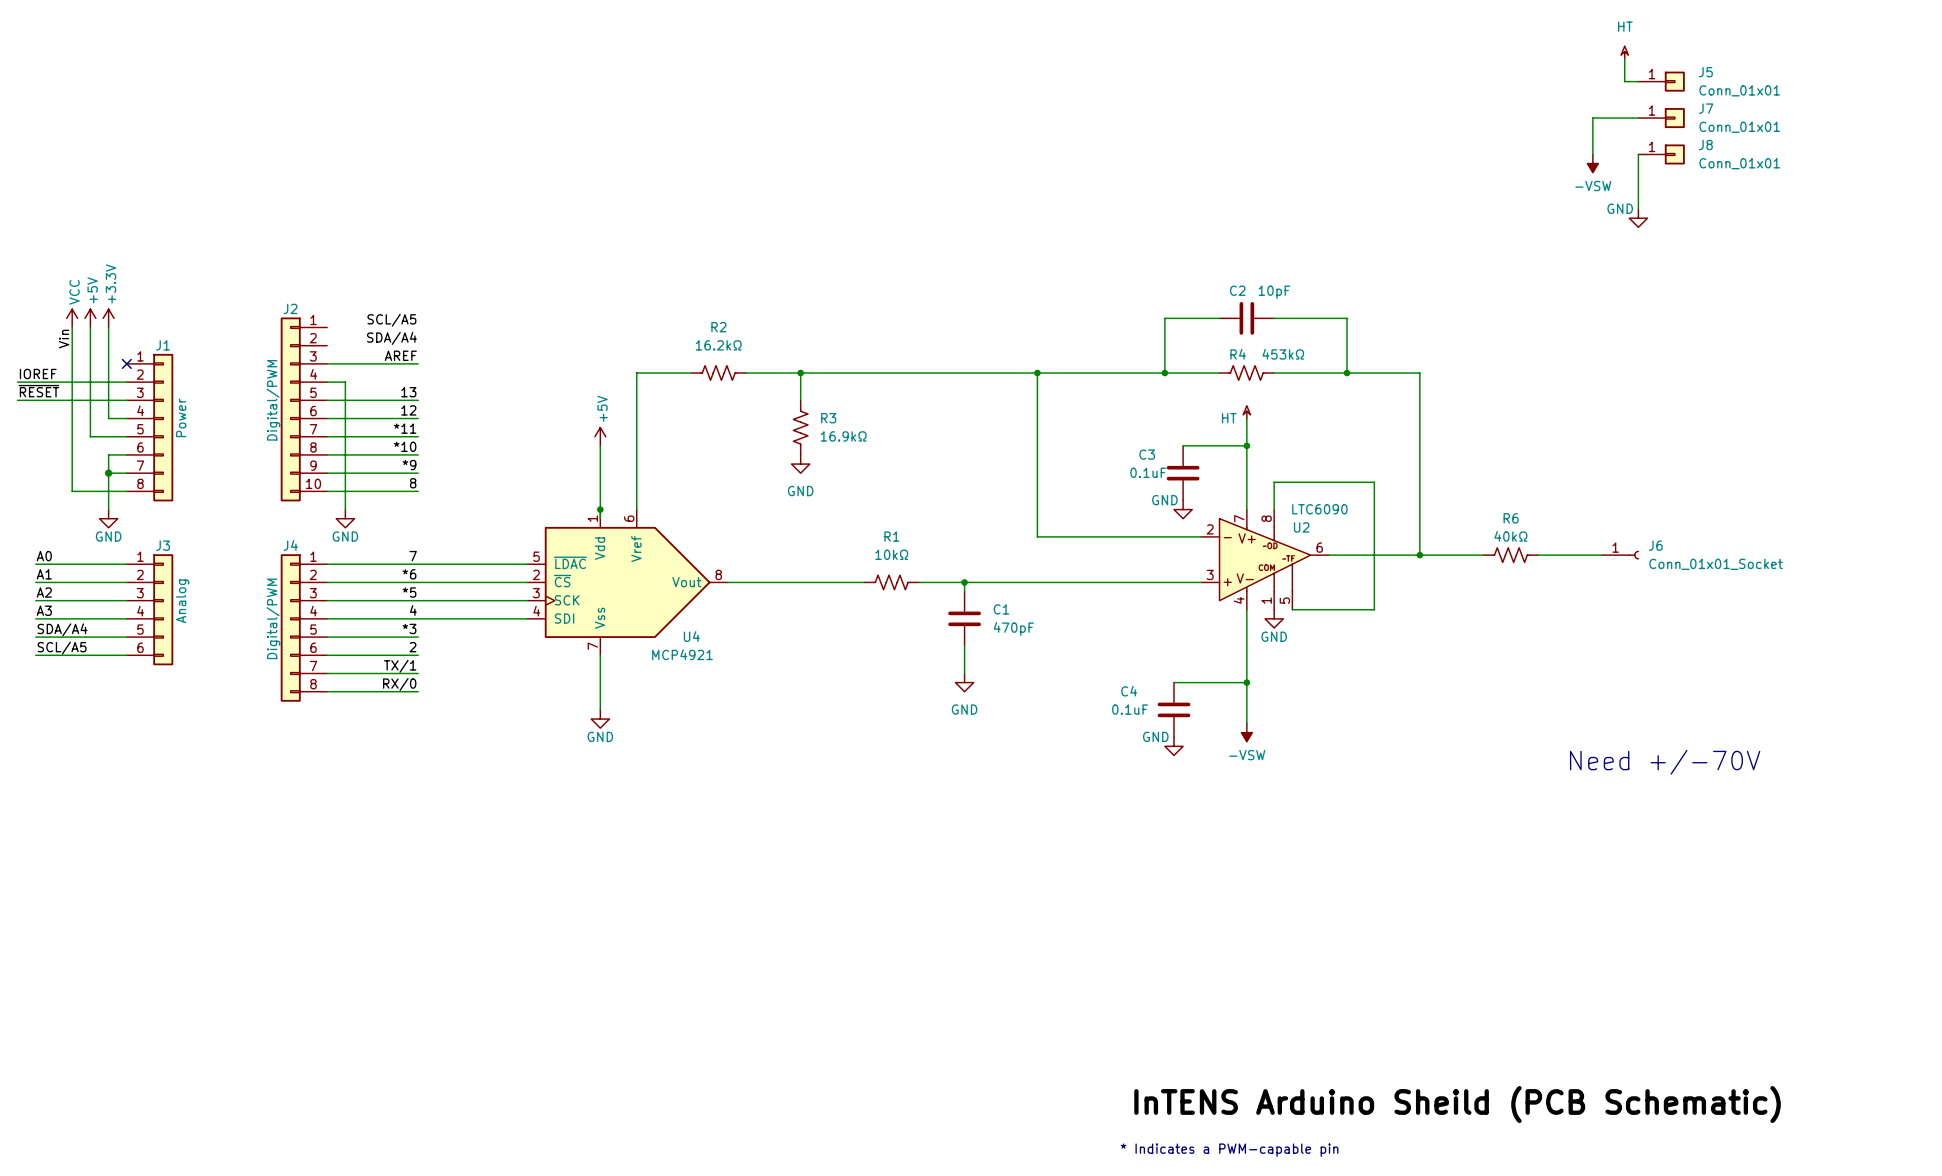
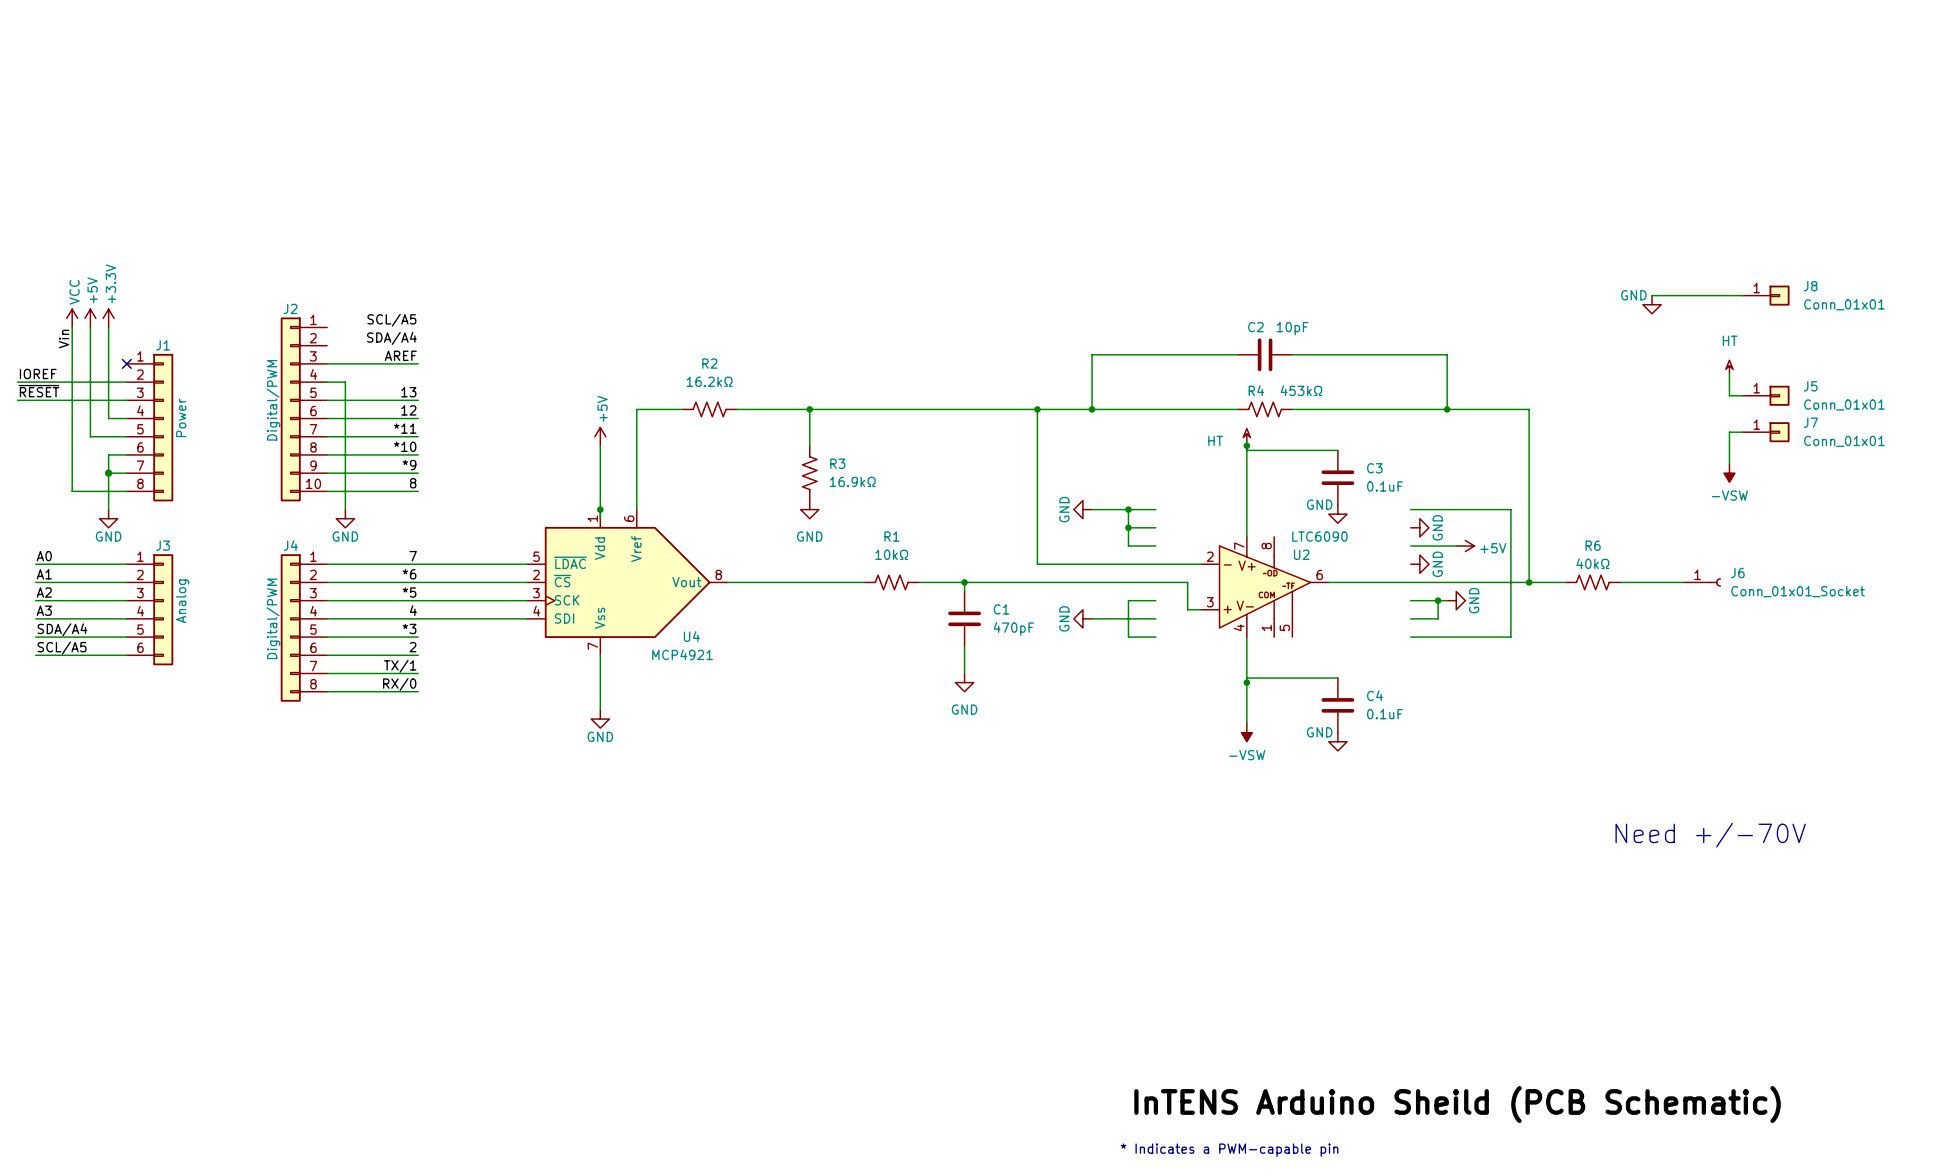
power symbol: HT (1624, 52) -> none
wire: (1624, 58) (1624, 81) (1638, 81) -> none
J5 position: (1661, 81) -> (1766, 395)
wire: (1638, 118) (1592, 118) (1592, 154) -> none
J7 position: (1661, 118) -> (1766, 432)
wire: (1638, 154) (1638, 209) -> none
J8 position: (1661, 154) -> (1766, 295)
power symbol: -VSW (1592, 163) -> none
power symbol position: GND (1638, 218) -> GND (1652, 304)
wire: none -> (1652, 295) (1743, 295)
wire: (1219, 318) (1164, 318) (1164, 373) -> none
C2 position: (1246, 318) -> (1265, 354)
wire: (1274, 318) (1347, 318) (1347, 373) -> none
wire: none -> (1237, 354) (1092, 354) (1092, 409)
wire: none -> (1292, 354) (1447, 354) (1447, 409)
power symbol: none -> HT (1729, 366)
wire: (691, 373) (636, 373) (636, 409) -> (682, 409) (636, 409)
R2 position: (718, 373) -> (709, 409)
wire: (746, 373) (1219, 373) -> none
wire: (800, 373) (800, 400) -> none
junction position: (800, 373) -> (809, 409)
wire: (1037, 373) (1037, 409) -> none
junction: (1037, 373) -> none
junction: (1164, 373) -> none
R4 position: (1246, 373) -> (1265, 409)
wire: (1274, 373) (1419, 373) (1419, 555) -> none
junction: (1347, 373) -> none
wire: none -> (1729, 373) (1729, 395) (1743, 395)
wire: none -> (736, 409) (1237, 409)
wire: none -> (809, 409) (809, 445)
junction: none -> (1037, 409)
junction: none -> (1092, 409)
wire: none -> (1292, 409) (1529, 409) (1529, 582)
junction: none -> (1447, 409)
power symbol position: HT (1246, 412) -> HT (1246, 434)
power symbol text position: HT (1229, 418) -> HT (1215, 440)
wire: (1246, 418) (1246, 441) -> none
R3 position: (800, 427) -> (809, 473)
wire: none -> (1743, 432) (1729, 432) (1729, 464)
wire: (1183, 445) (1246, 445) -> (1092, 509) (1155, 509)
wire: none -> (1246, 450) (1337, 450)
C3 name position: C3 (1147, 454) -> C3 (1374, 468)
power symbol position: GND (800, 464) -> GND (809, 509)
C3 value position: 0.1uF (1148, 472) -> 0.1uF (1385, 486)
C3 position: (1183, 473) -> (1337, 477)
power symbol: none -> -VSW (1729, 473)
power symbol: none -> GND (1082, 509)
wire: none -> (1128, 509) (1128, 546) (1155, 546)
junction: none -> (1128, 509)
power symbol: GND (1183, 509) -> none
wire: (1274, 509) (1274, 482) (1374, 482) (1374, 609) (1292, 609) -> none
wire: none -> (1410, 509) (1510, 509) (1510, 637) (1410, 637)
power symbol: none -> GND (1337, 514)
wire: none -> (1128, 527) (1155, 527)
junction: none -> (1128, 527)
power symbol: none -> GND (1419, 527)
wire: (1037, 536) (1201, 536) -> (1037, 536) (1037, 564) (1201, 564)
wire: none -> (1410, 546) (1456, 546)
power symbol: none -> +5V (1465, 546)
wire: (1328, 555) (1483, 555) -> none
junction: (1419, 555) -> none
R6 position: (1510, 555) -> (1592, 582)
wire: (1538, 555) (1601, 555) -> (1620, 582) (1683, 582)
J6 position: (1620, 555) -> (1702, 582)
U2 position: (1265, 559) -> (1265, 586)
power symbol: none -> GND (1419, 564)
wire: (1187, 582) (1201, 582) -> (1187, 582) (1187, 609) (1201, 609)
wire: none -> (1328, 582) (1565, 582)
junction: none -> (1529, 582)
wire: none -> (1155, 600) (1128, 600) (1128, 637) (1155, 637)
wire: none -> (1410, 600) (1447, 600)
wire: none -> (1438, 600) (1438, 618) (1410, 618)
junction: none -> (1438, 600)
power symbol: none -> GND (1456, 600)
power symbol: none -> GND (1082, 618)
wire: none -> (1092, 618) (1155, 618)
power symbol: GND (1274, 618) -> none
wire: none -> (1246, 678) (1337, 678)
wire: (1174, 682) (1246, 682) -> none
C4 name position: C4 (1129, 691) -> C4 (1375, 695)
C4 value position: 0.1uF (1130, 709) -> 0.1uF (1385, 714)
C4 position: (1174, 709) -> (1337, 705)
power symbol: none -> GND (1337, 741)
power symbol: GND (1174, 746) -> none
text position: Need +/-70V (1665, 762) -> Need +/-70V (1710, 835)

